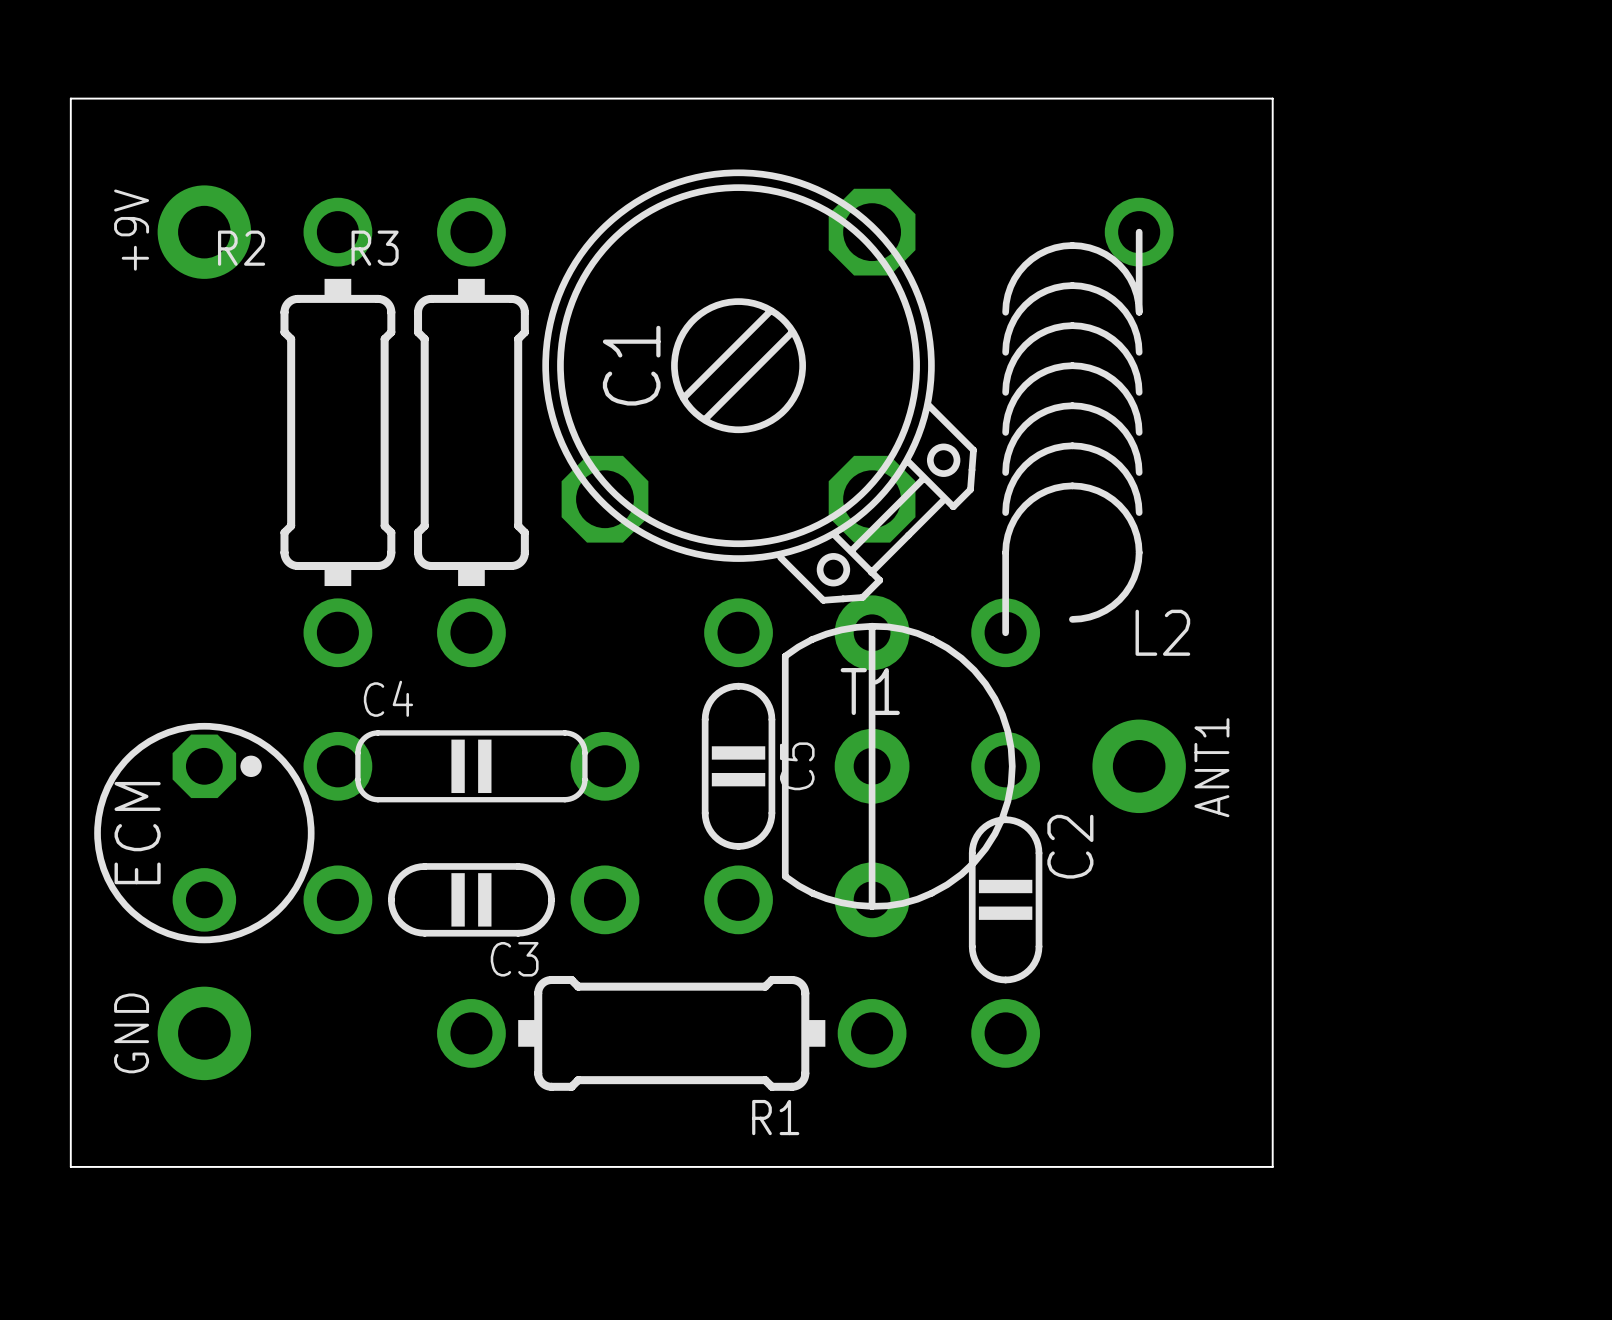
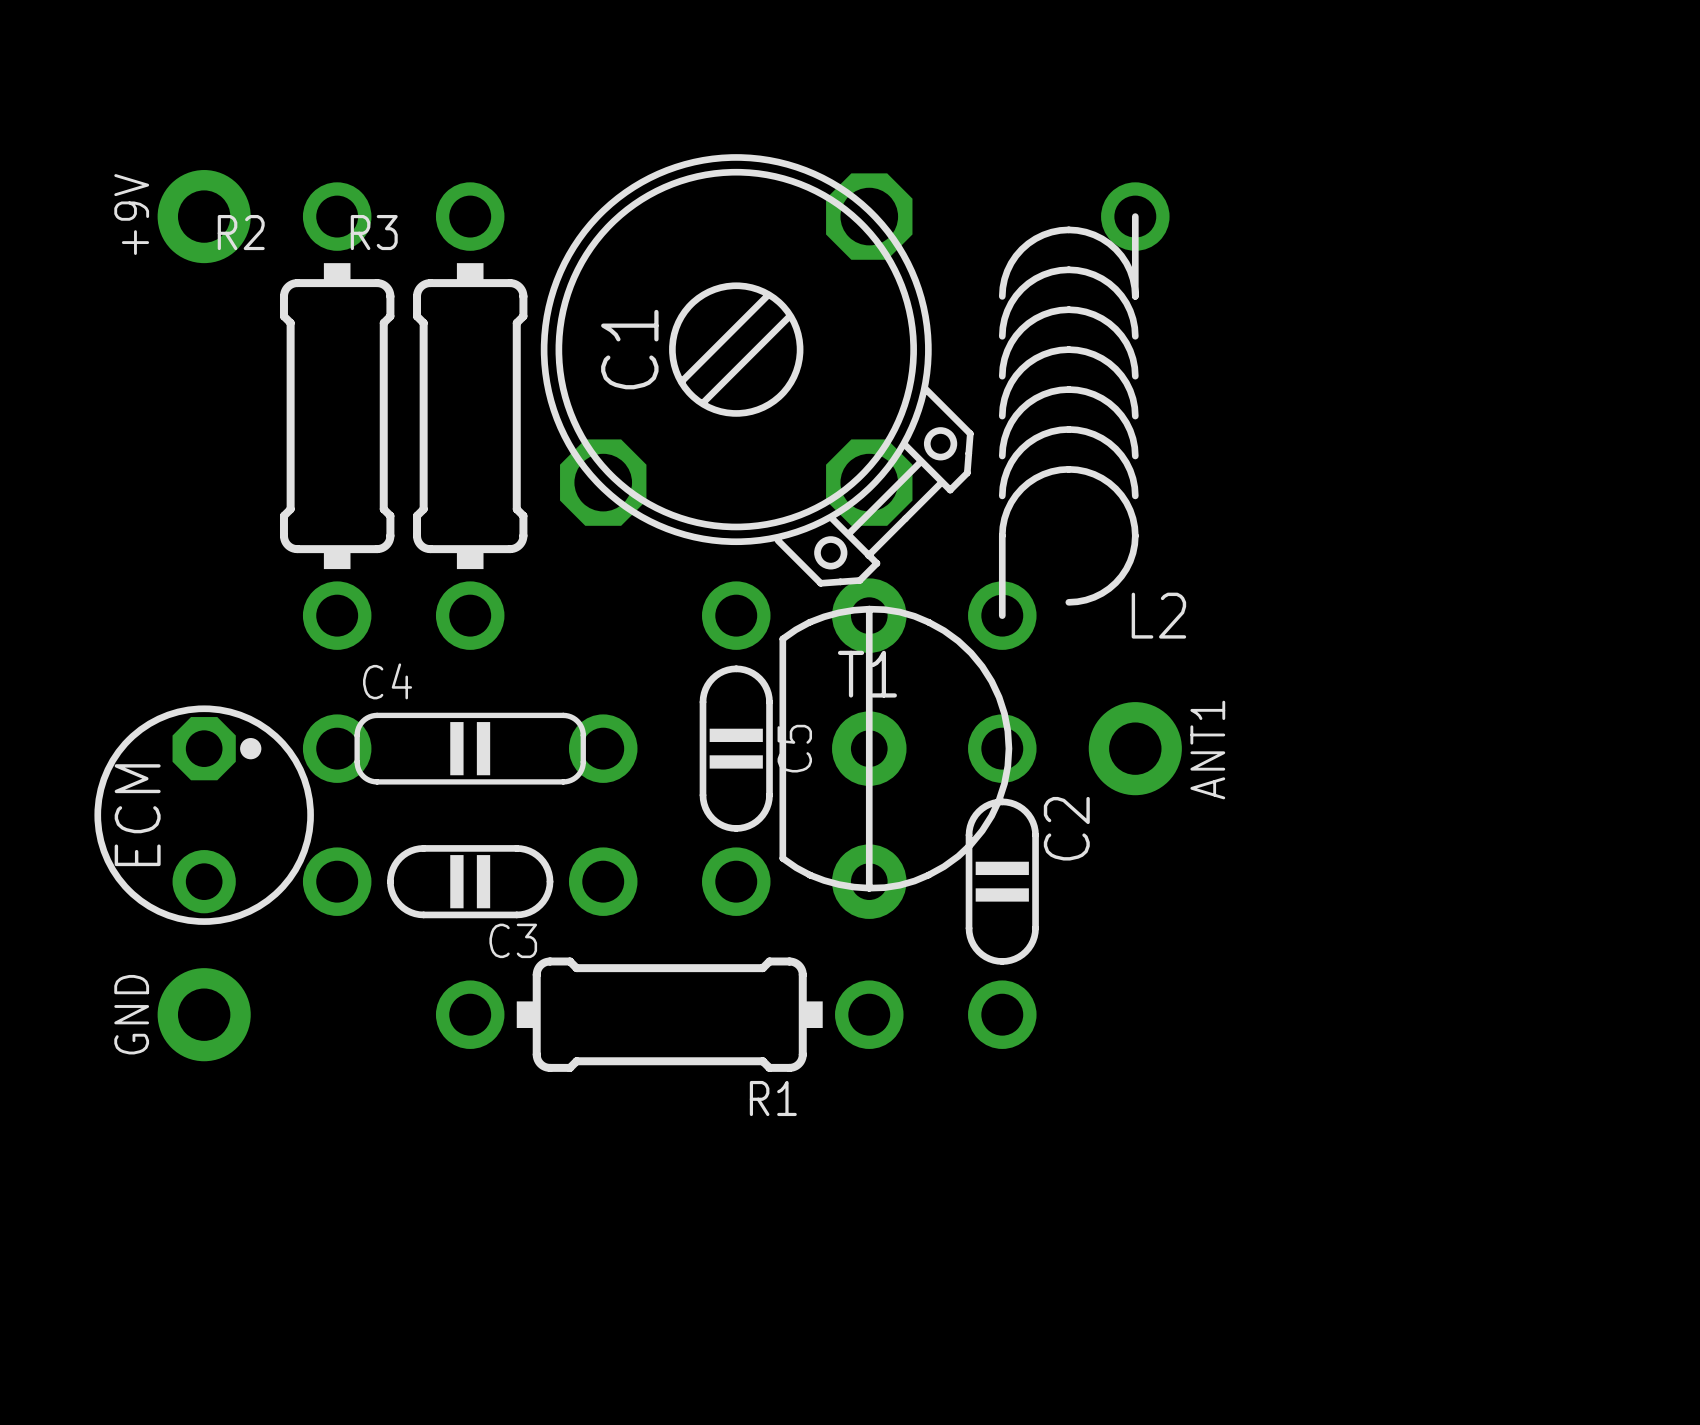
board edge: (70, 98) (70, 1166) (1272, 1166) (1272, 98) (70, 98) -> none

